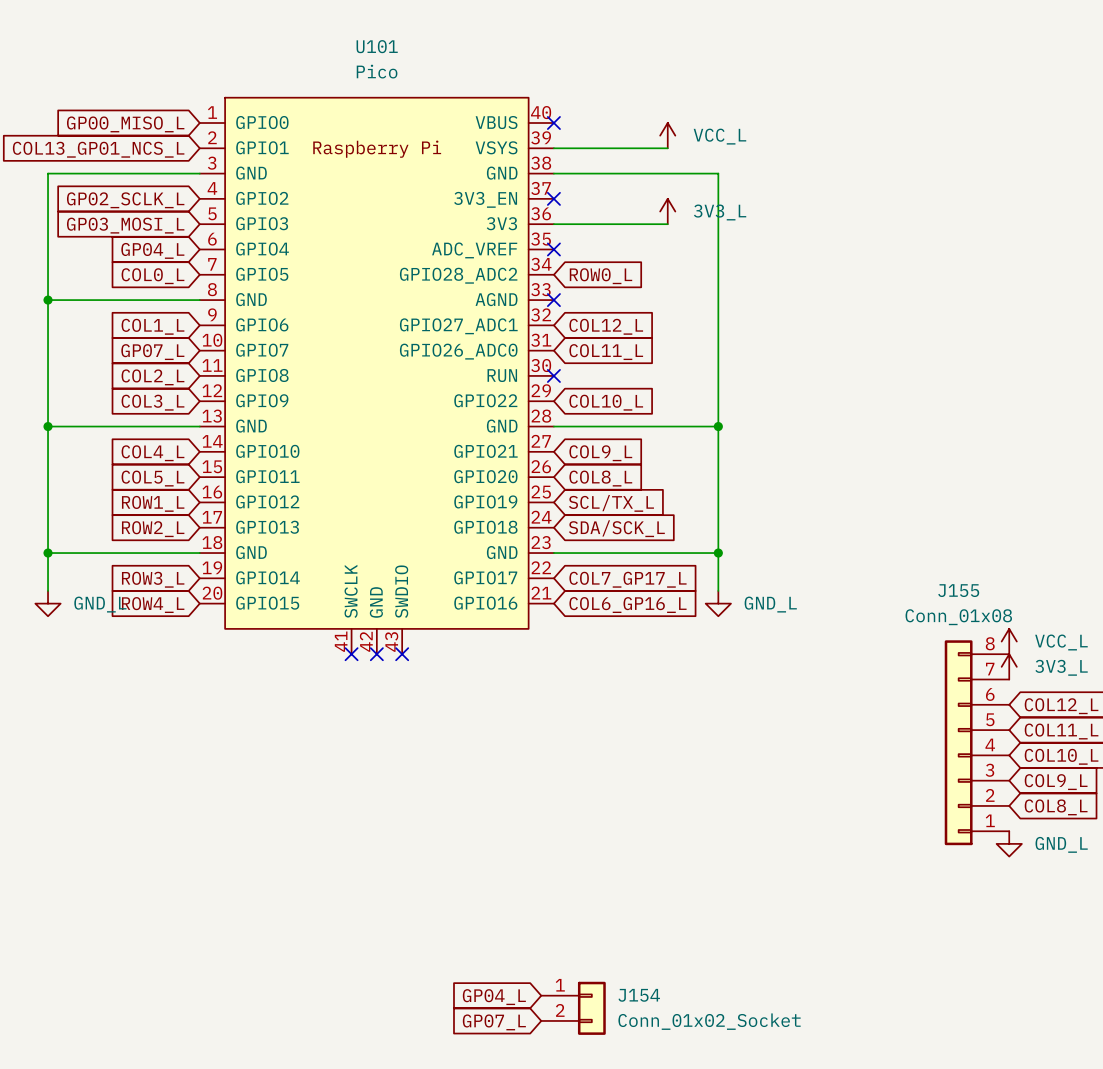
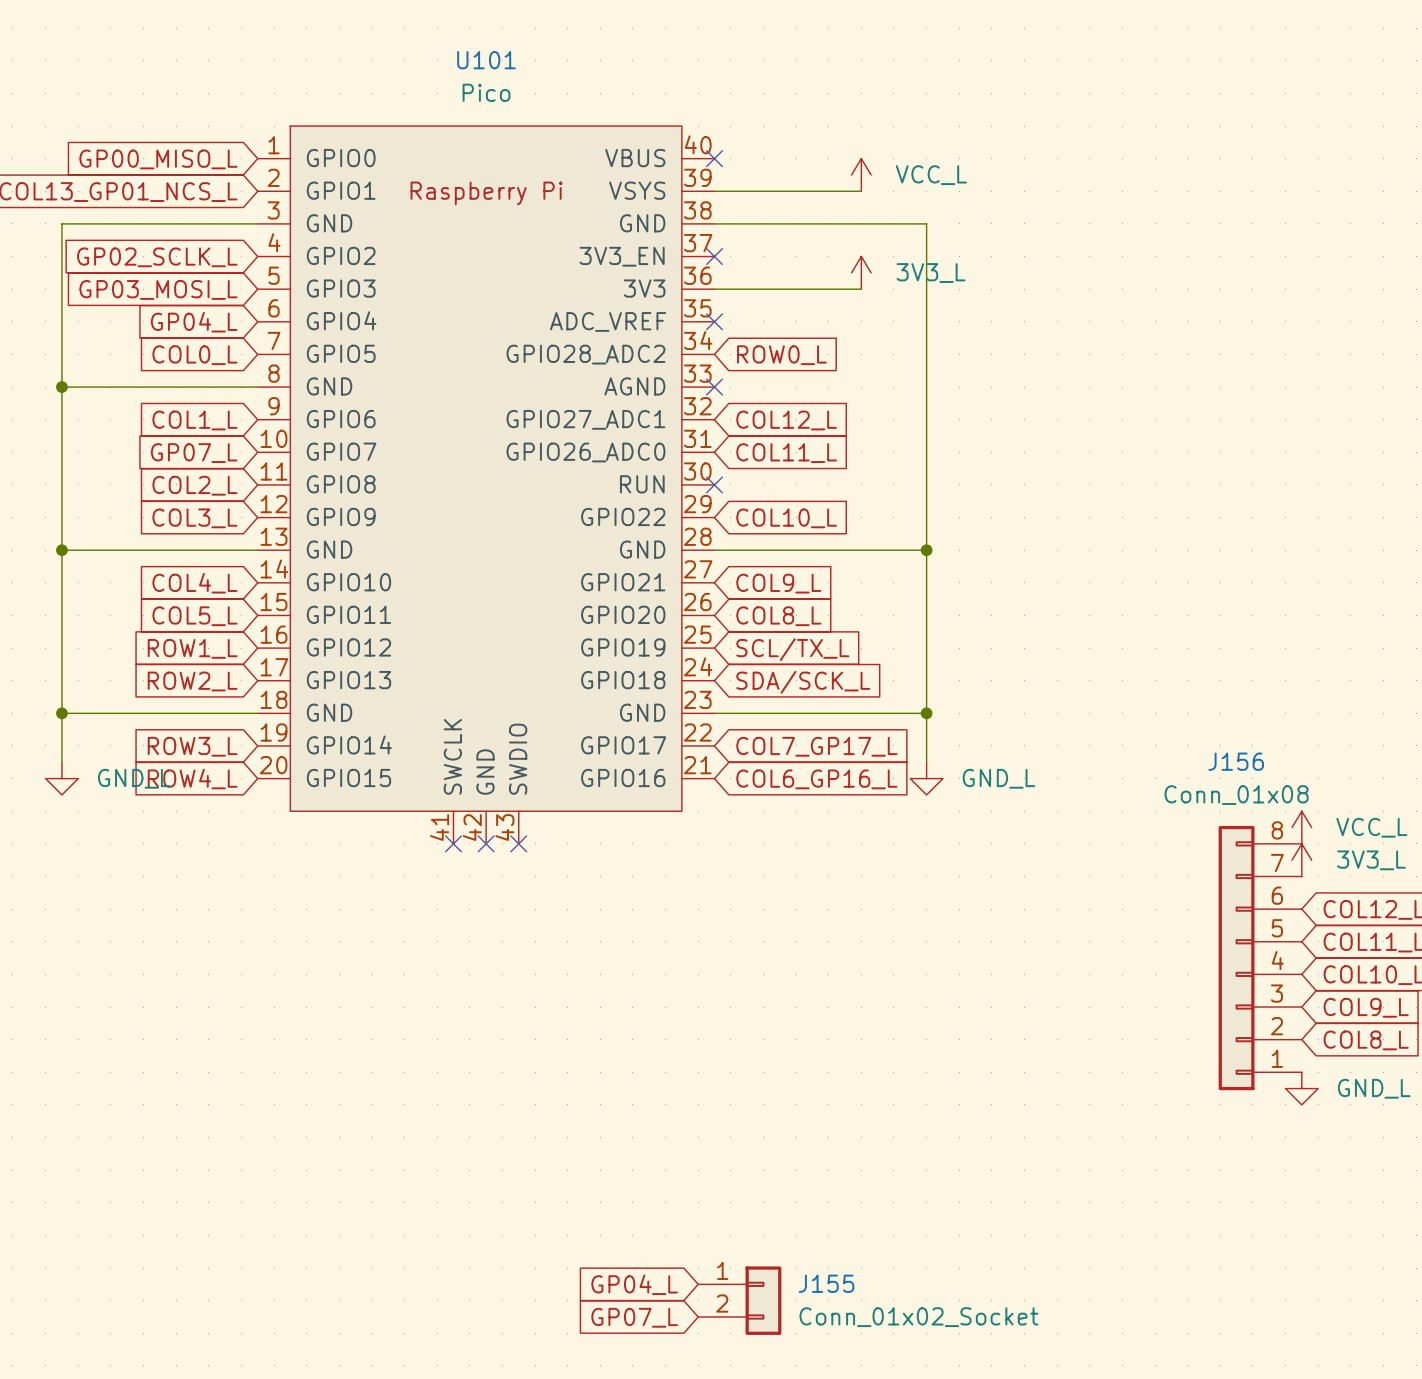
J155 name: J155 (958, 590) -> J156 (1236, 761)
J154 name: J154 (639, 995) -> J155 (826, 1283)

